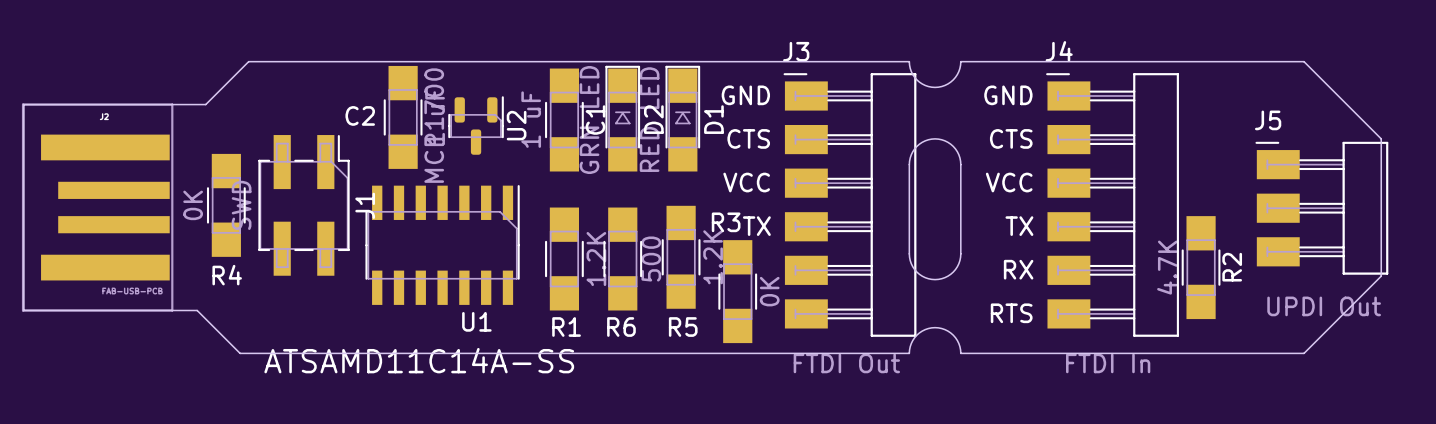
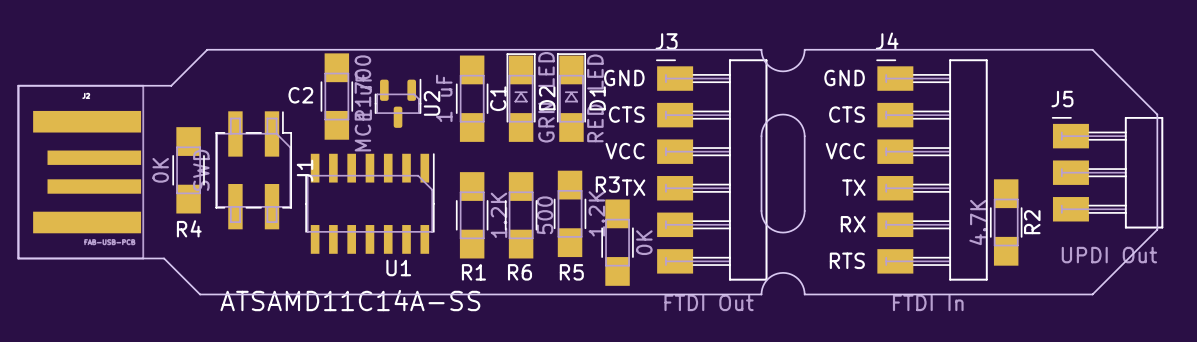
D1 value position: RED LED (649, 119) -> RED LED (595, 98)
D2 value position: GRN LED (589, 120) -> GRN LED (546, 97)

